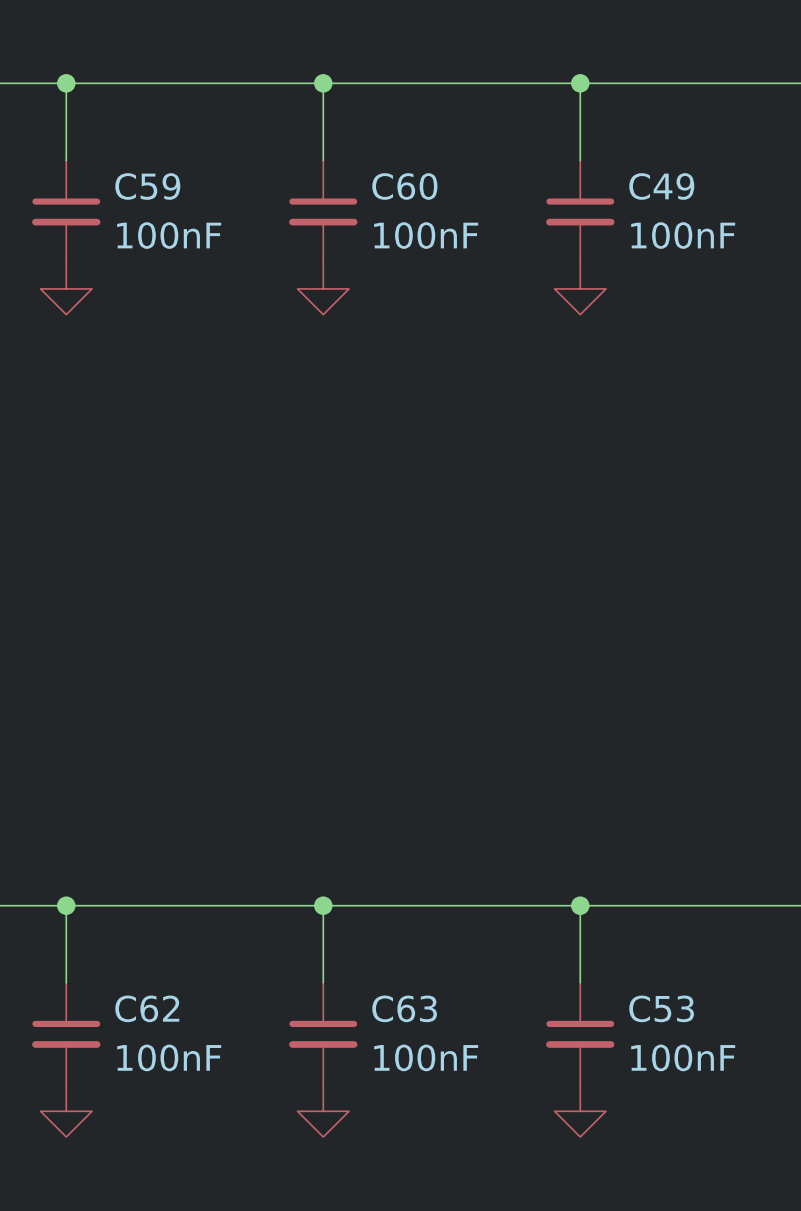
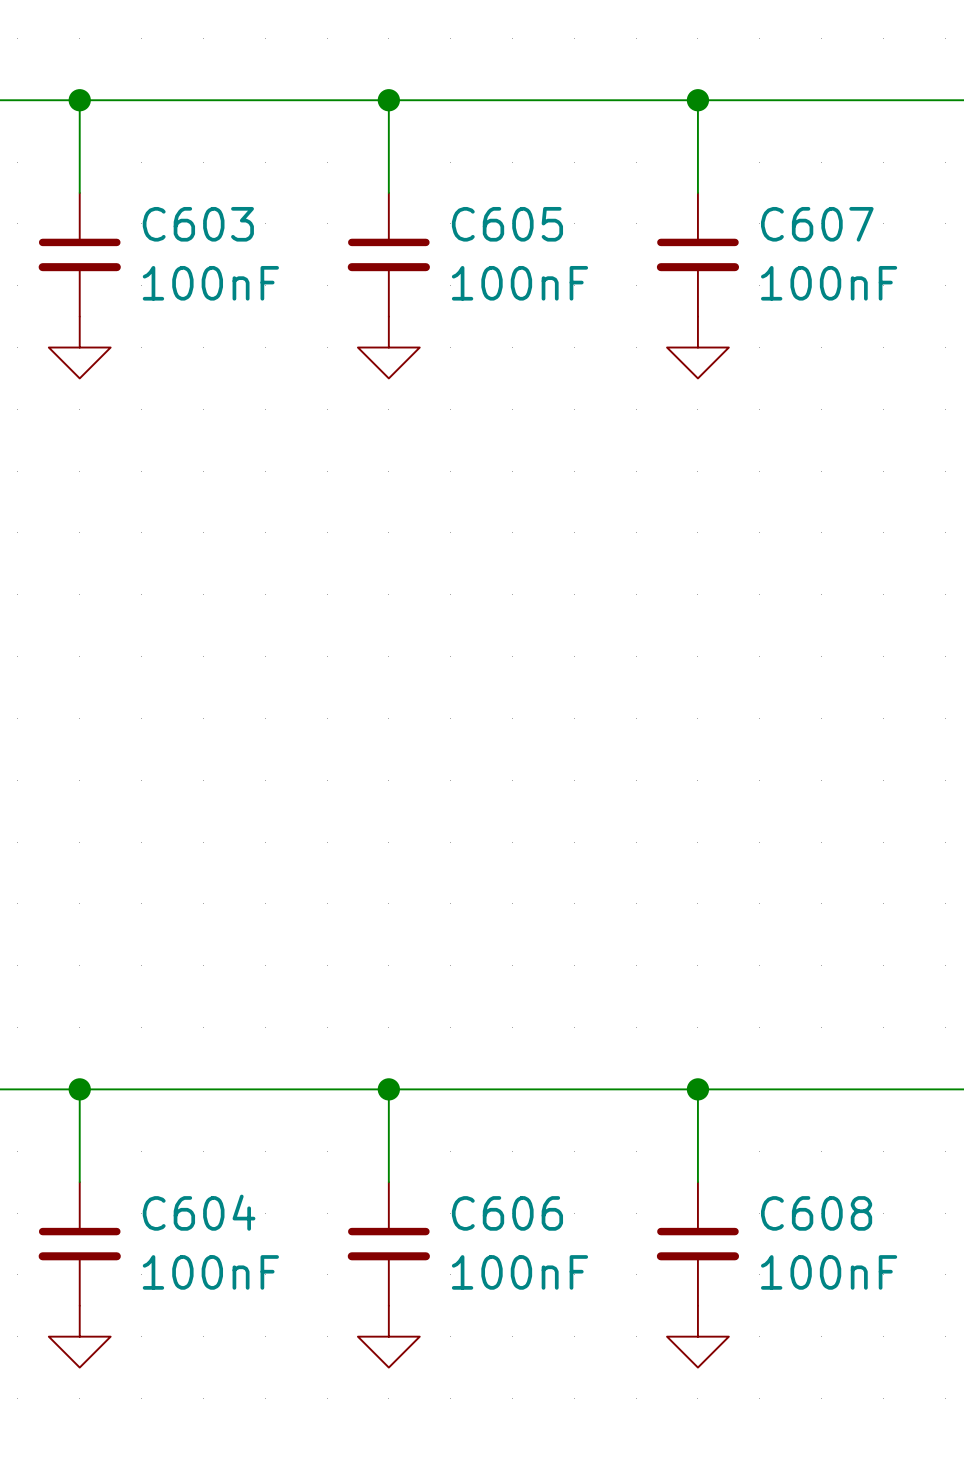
C59 name: C59 (147, 186) -> C603 (198, 224)
C60 name: C60 (404, 186) -> C605 (507, 224)
C49 name: C49 (661, 186) -> C607 (817, 224)
C62 name: C62 (147, 1008) -> C604 (199, 1212)
C63 name: C63 (404, 1008) -> C606 (507, 1213)
C53 name: C53 (661, 1008) -> C608 (816, 1213)

